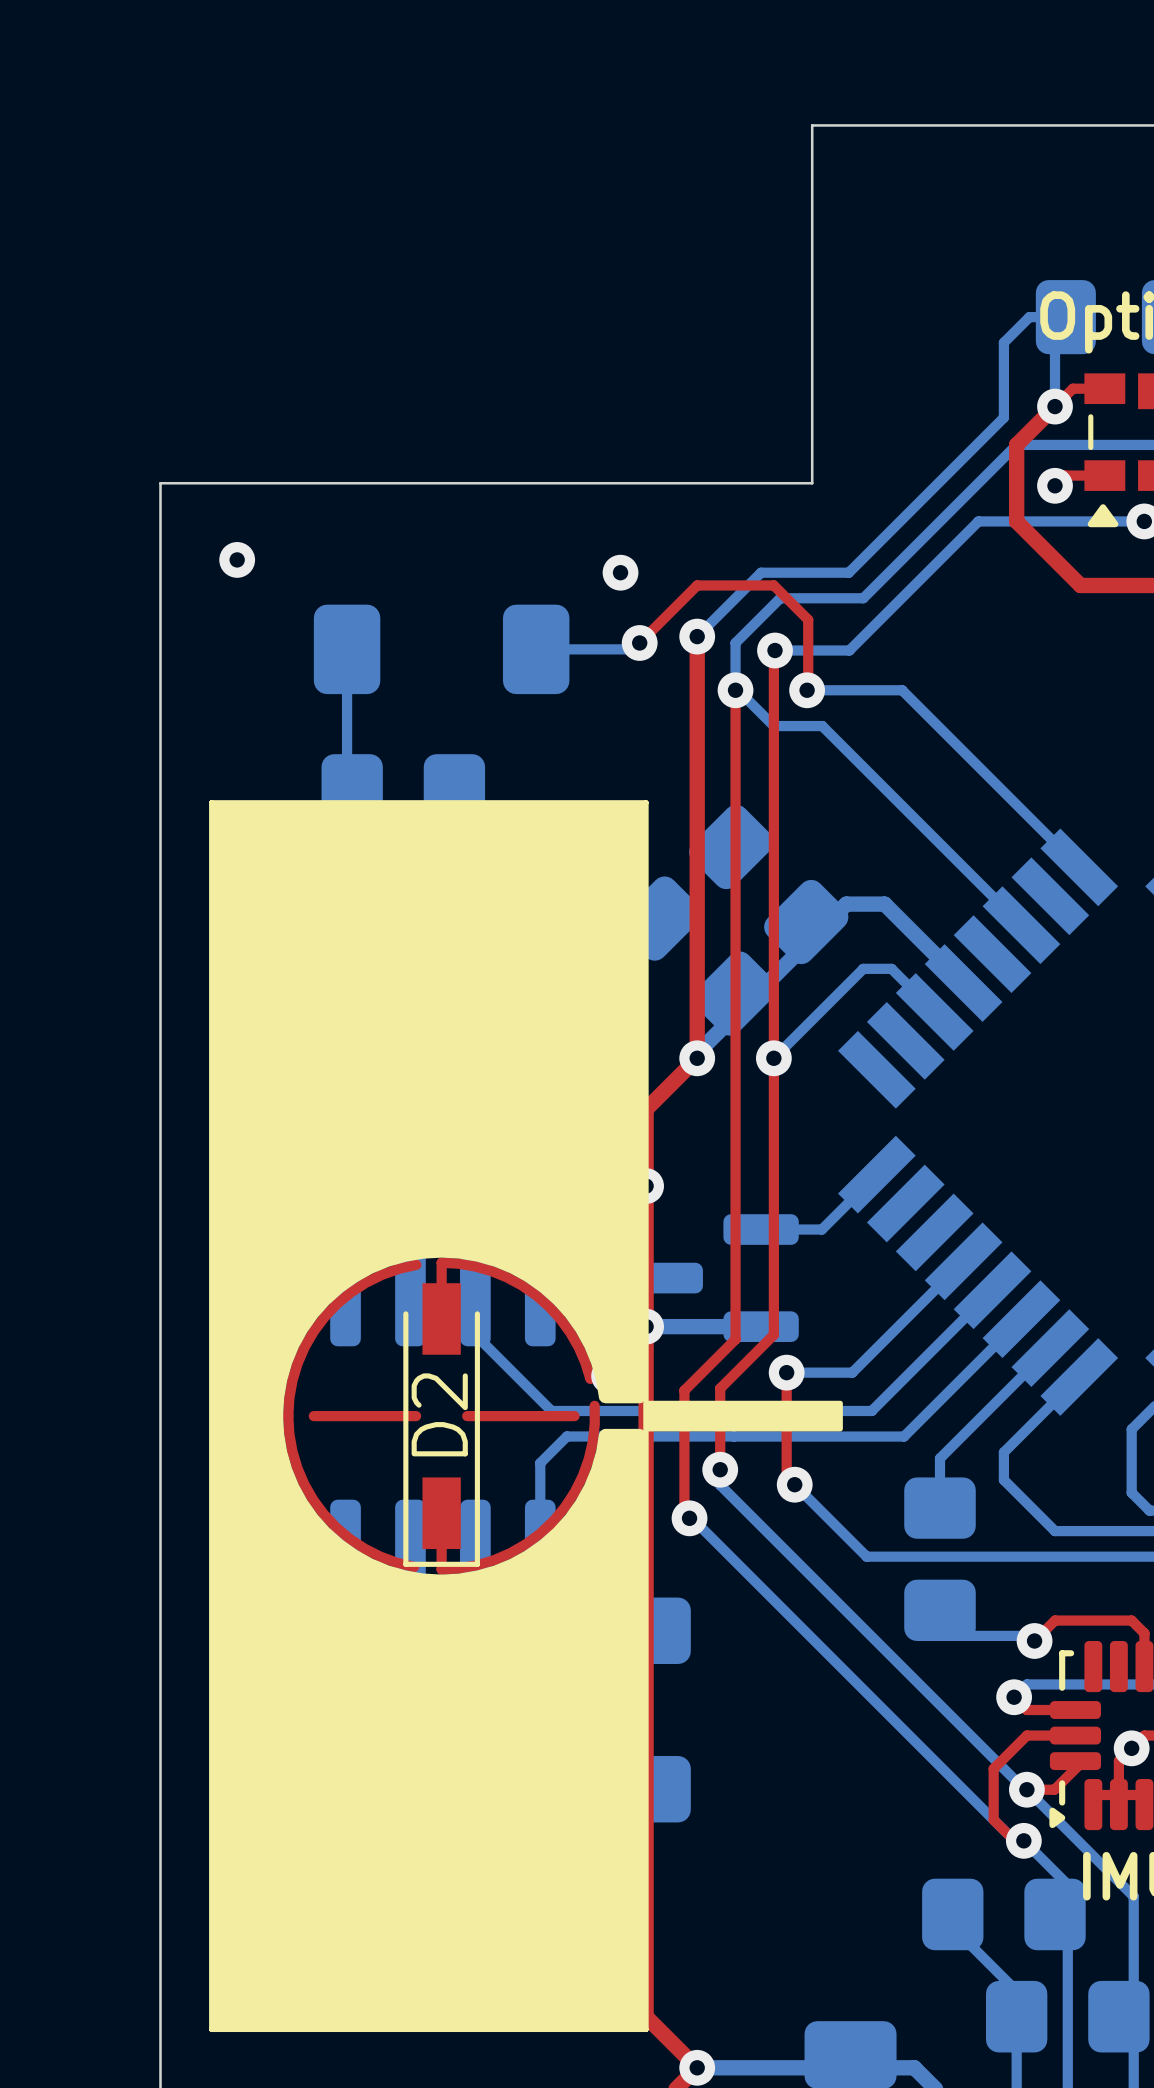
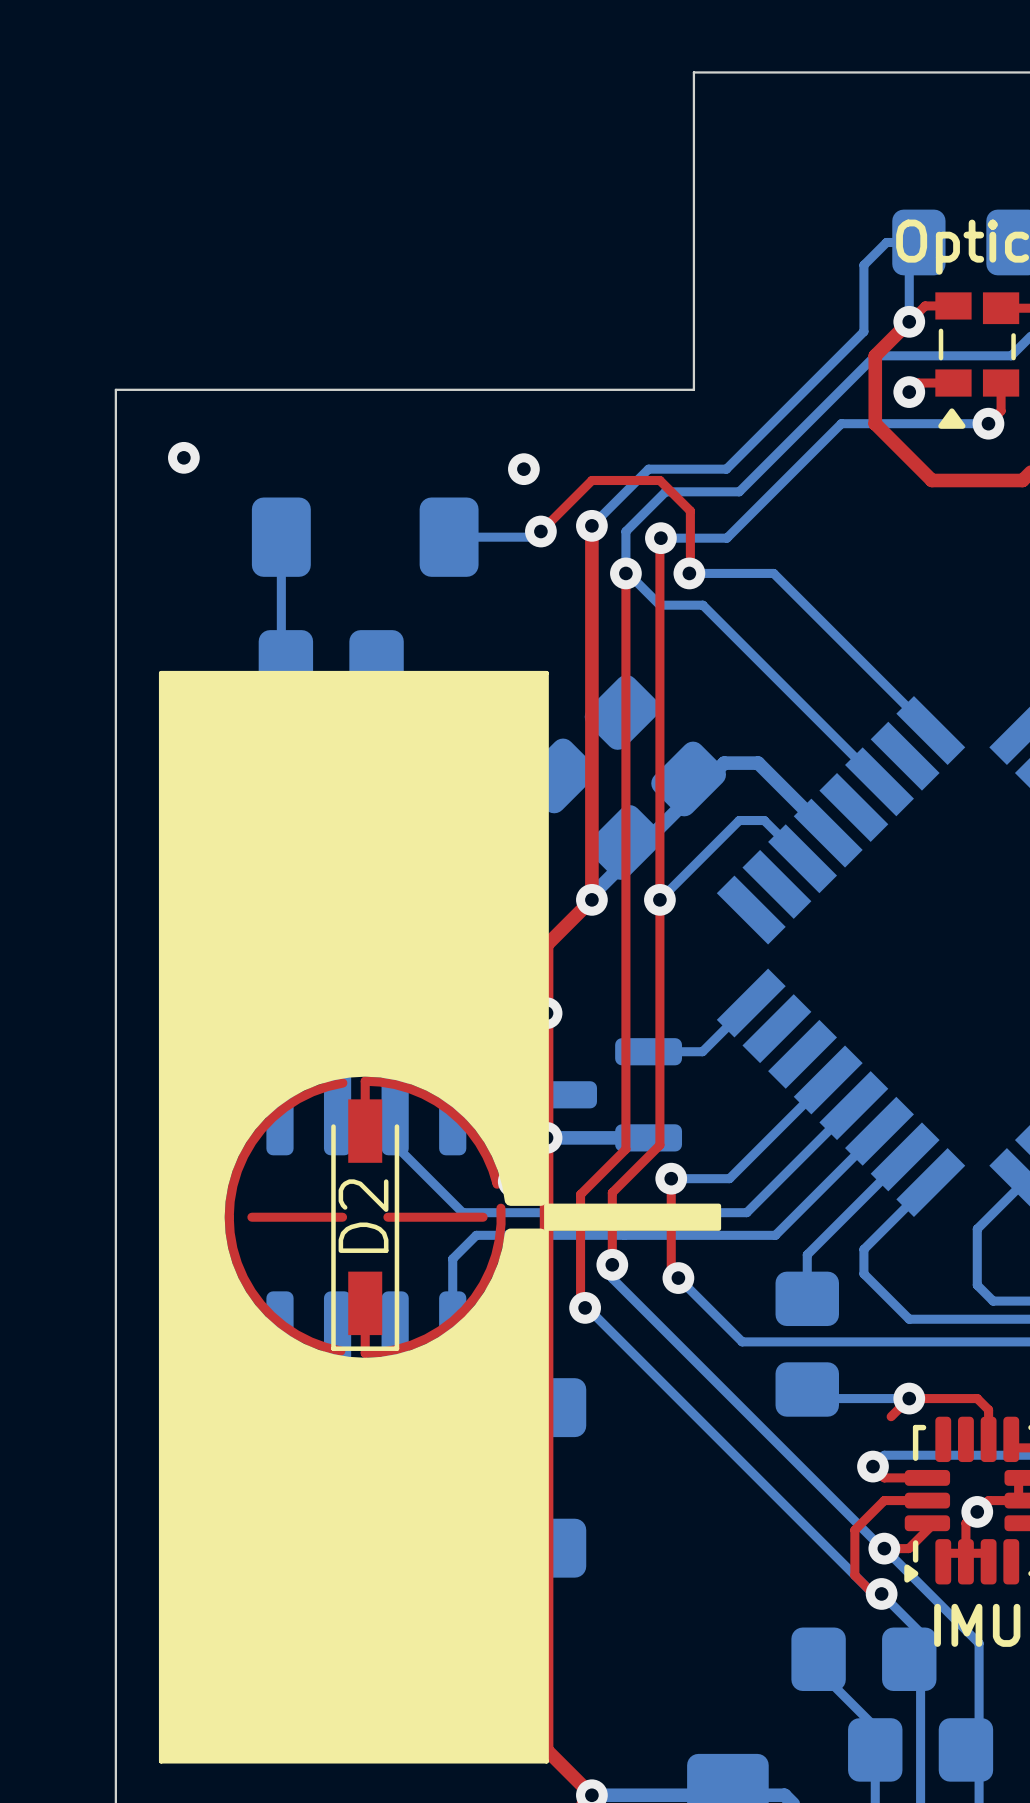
bottom track: (950, 1620) (965, 1635) (1029, 1635) (1034, 1641) -> (816, 1398) (909, 1398)
via position: (1034, 1641) -> (909, 1398)

